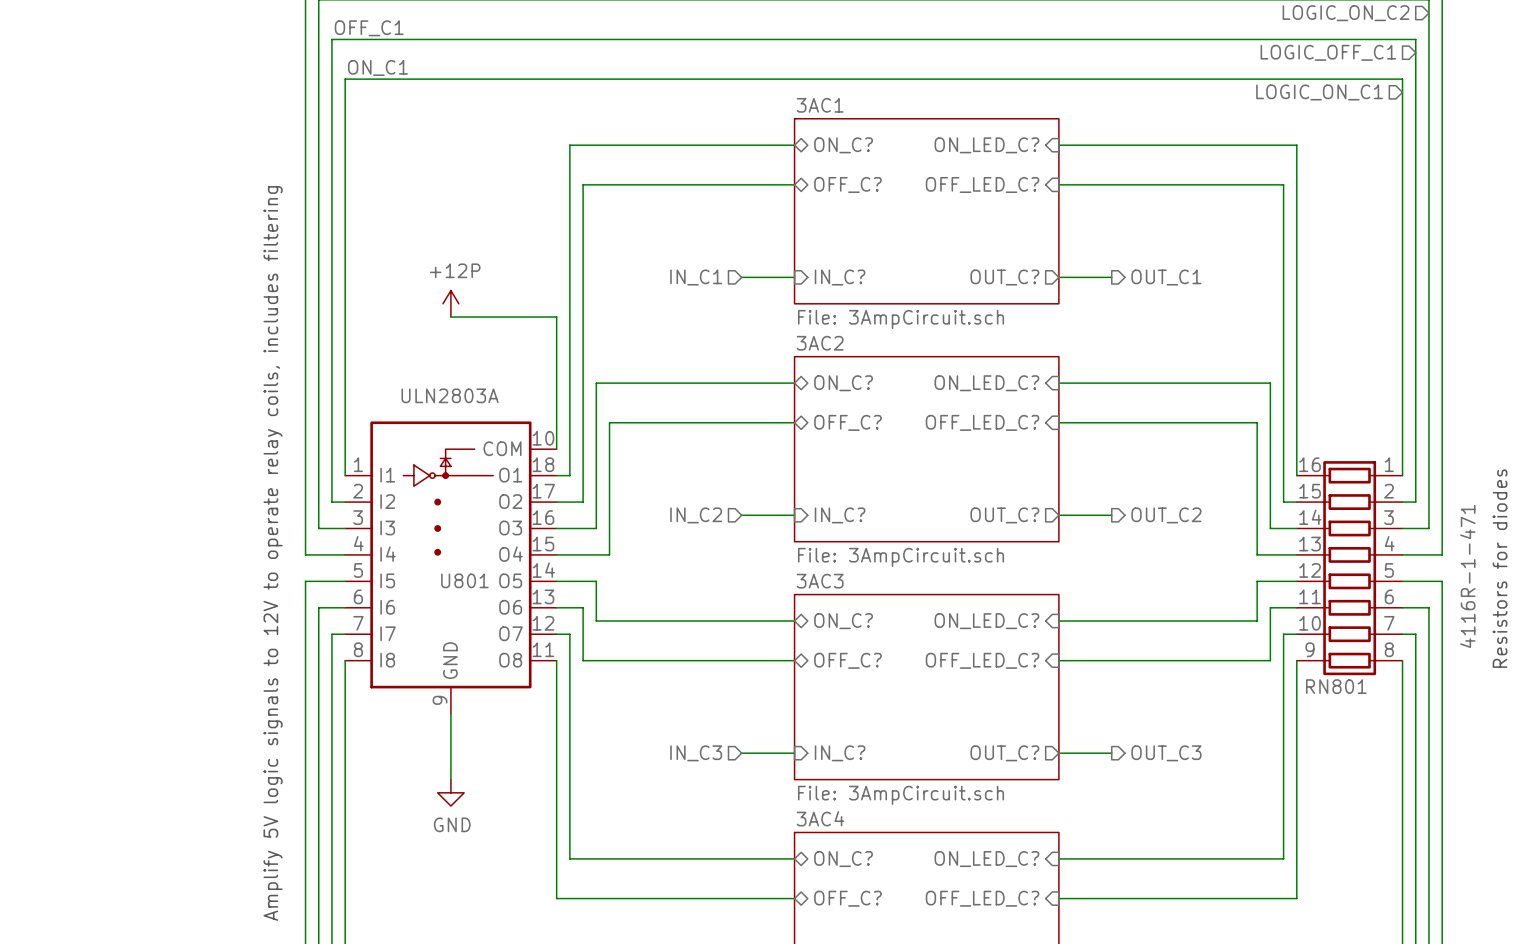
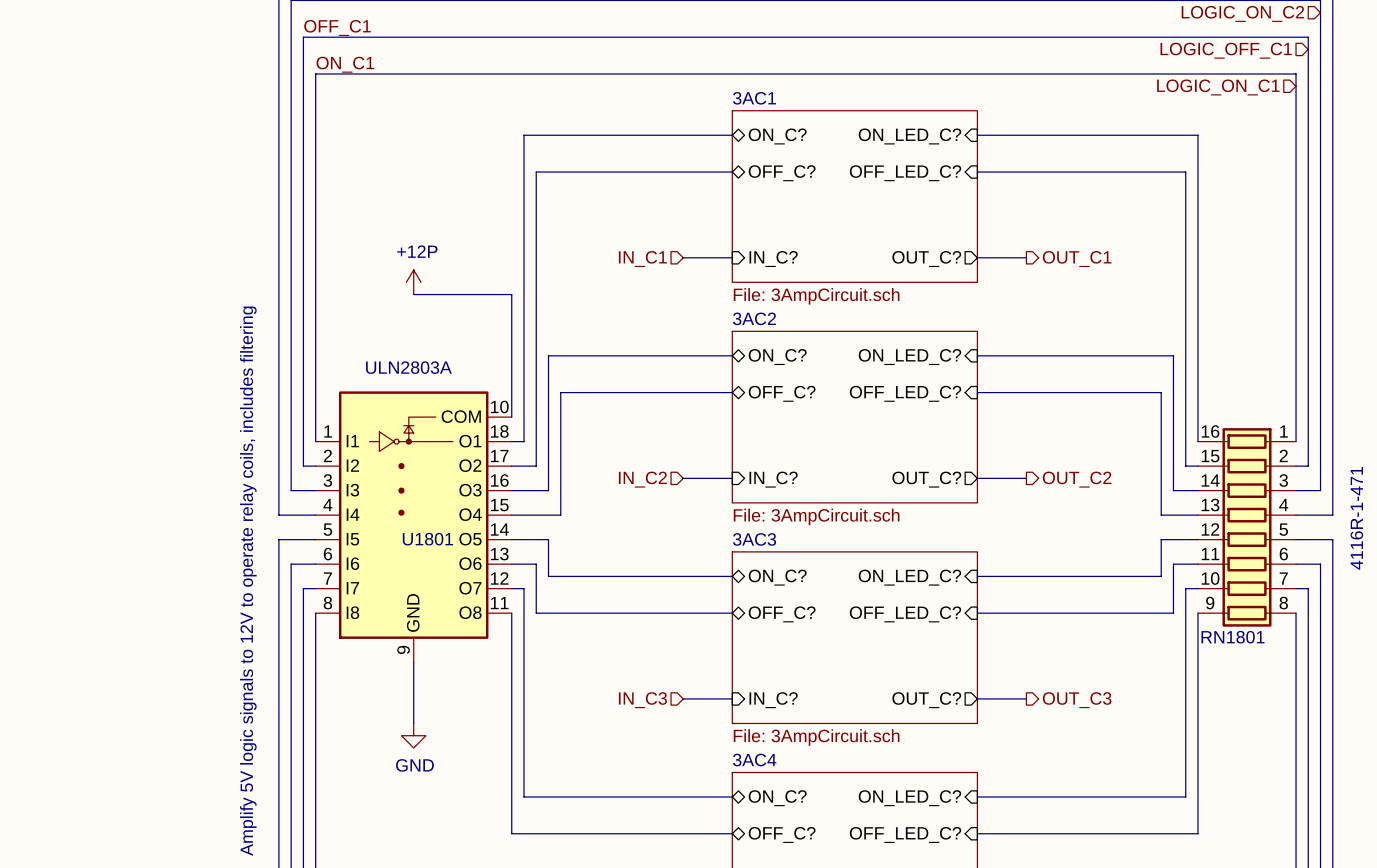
U801 name: U801 (464, 580) -> U1801 (427, 539)
RN801 name: RN801 (1336, 686) -> RN1801 (1233, 637)

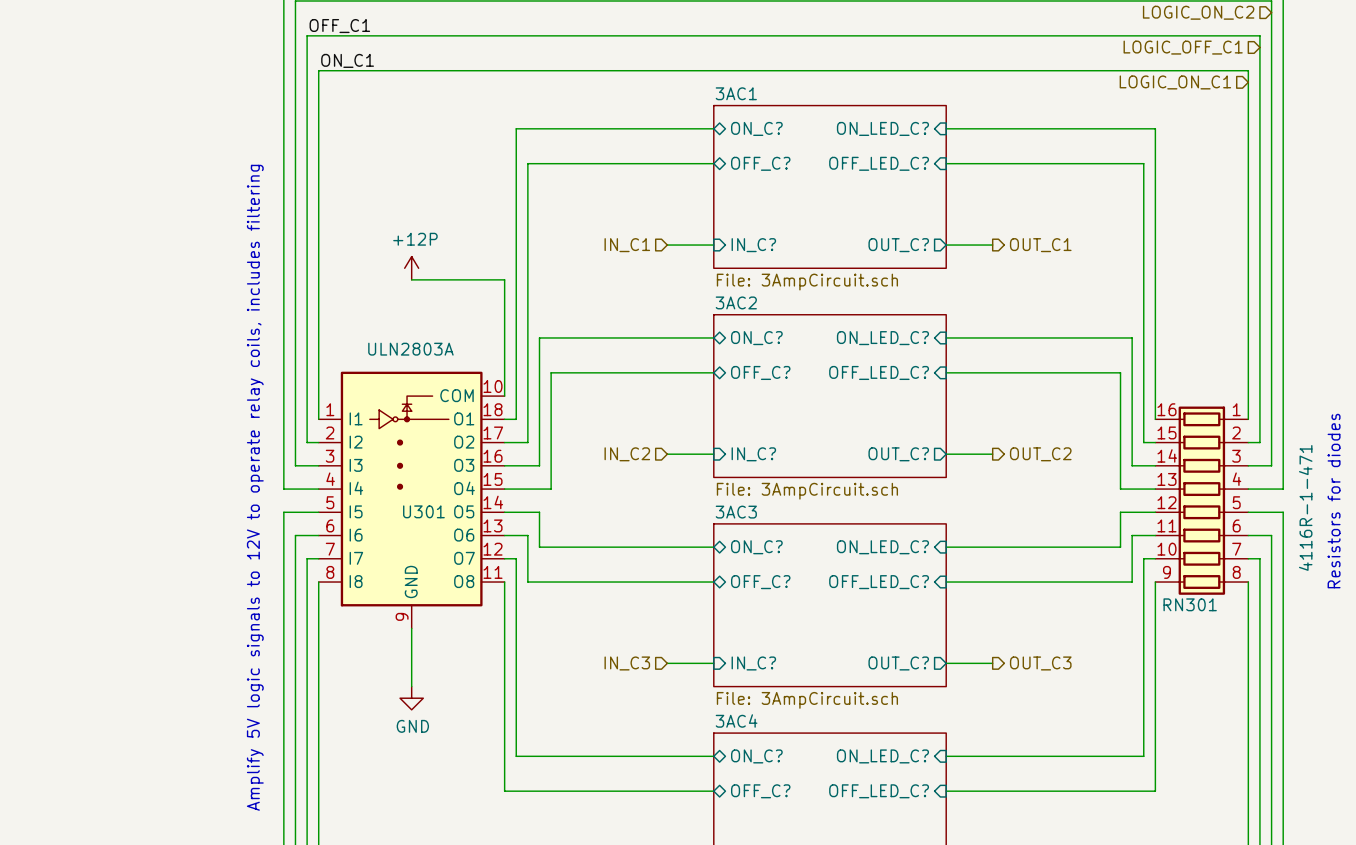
U1801 name: U1801 (427, 539) -> U301 (423, 511)
RN1801 name: RN1801 (1233, 637) -> RN301 (1190, 604)

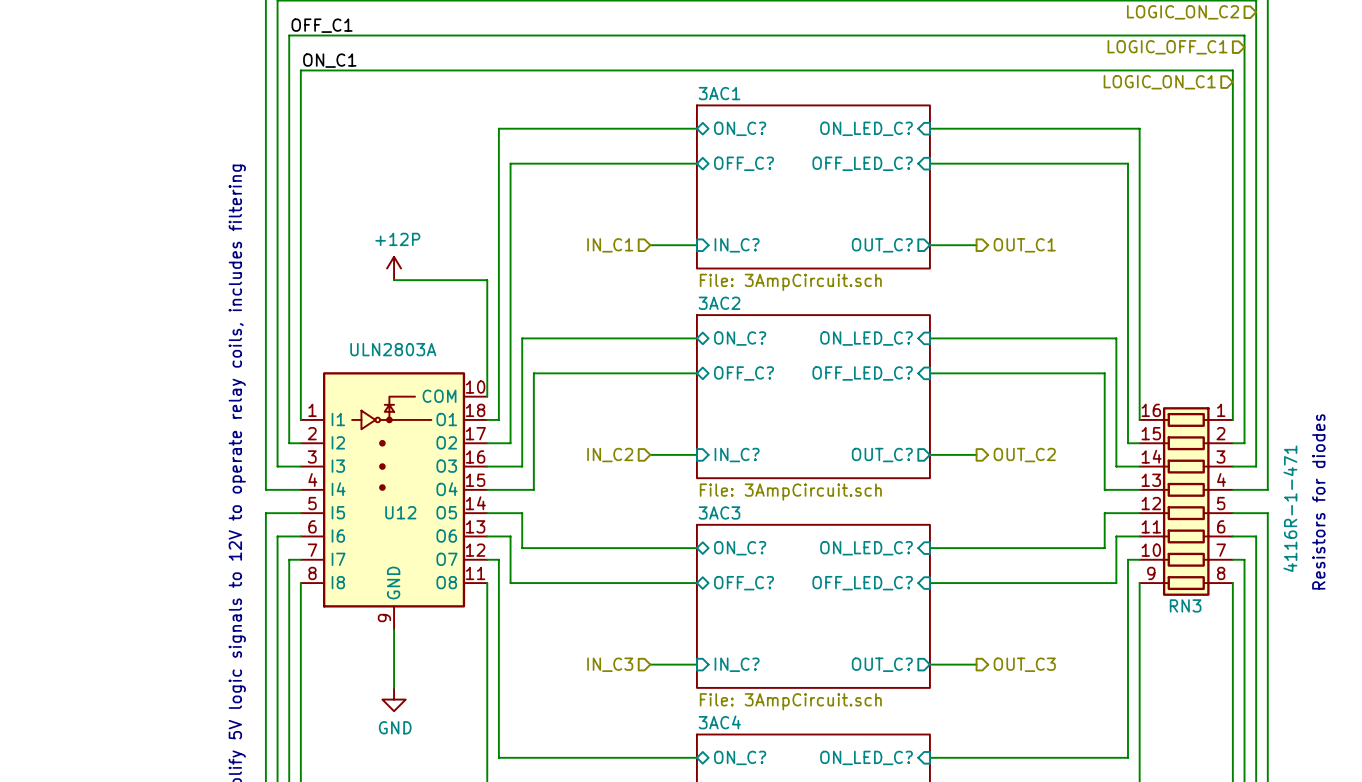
U301 name: U301 (423, 511) -> U12 (400, 512)
RN301 name: RN301 (1190, 604) -> RN3 (1185, 605)

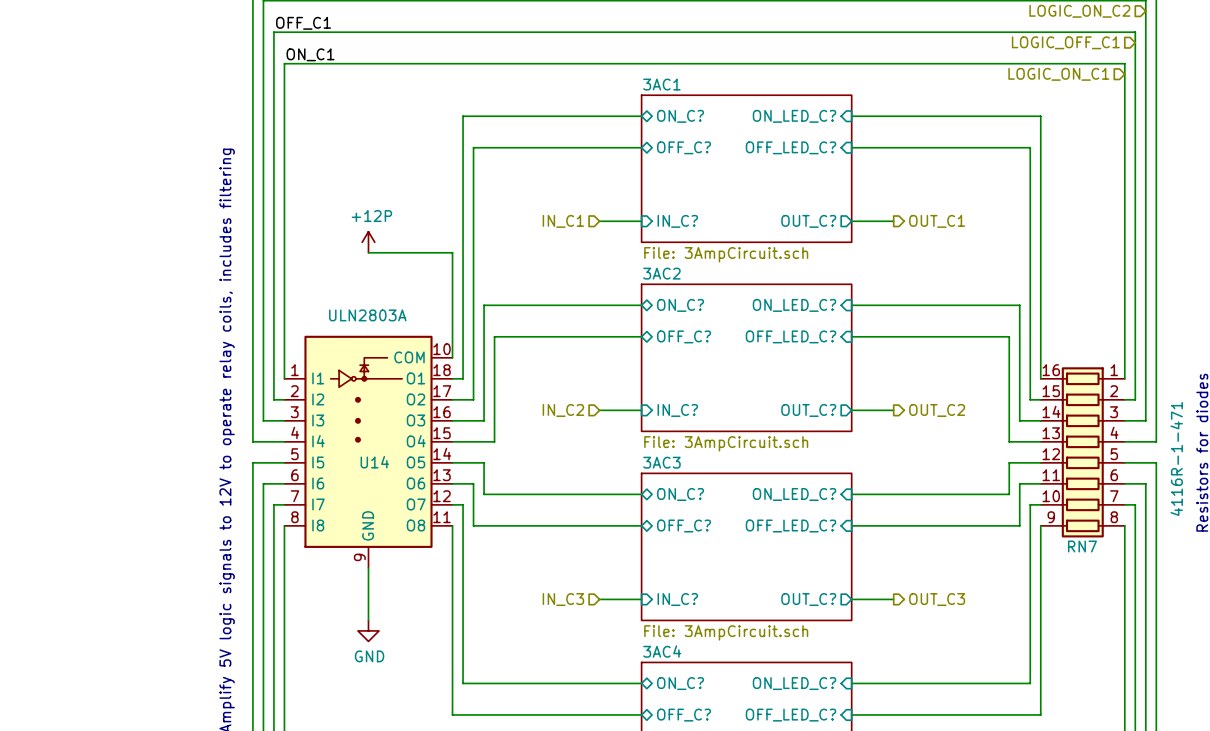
U12 name: U12 (400, 512) -> U14 (374, 462)
RN3 name: RN3 (1185, 605) -> RN7 (1082, 546)

